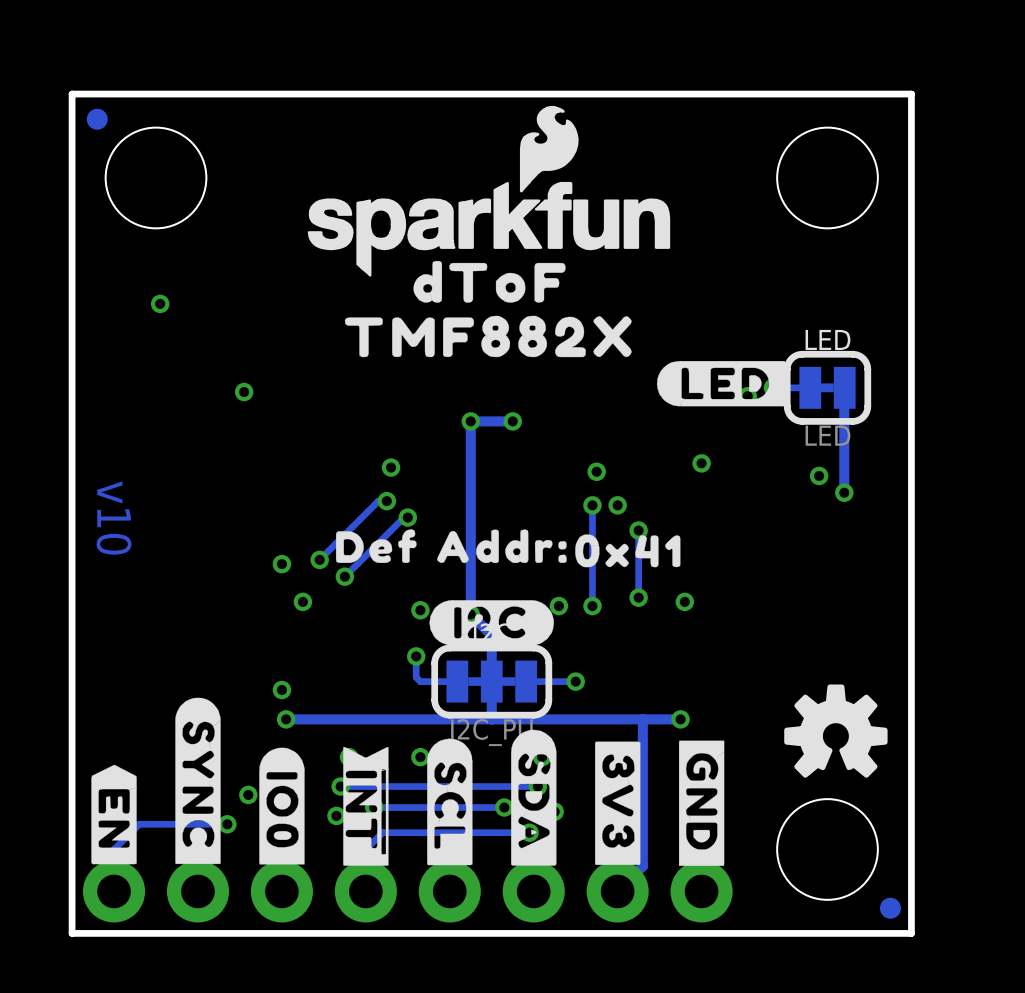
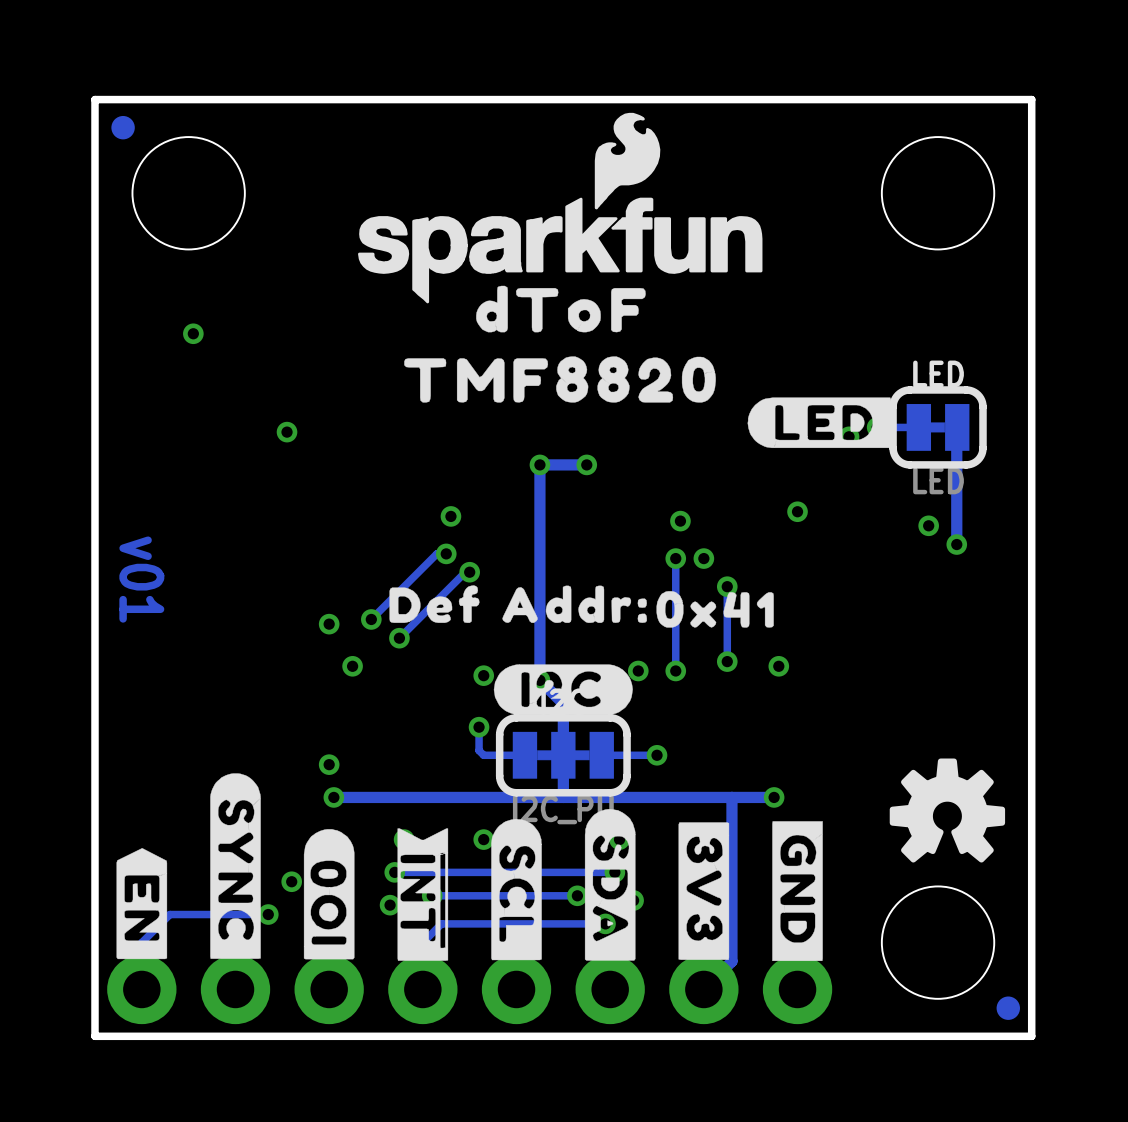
drawing shape: [344, 315, 632, 358] -> [404, 356, 716, 403]
text: v10 (114, 518) -> v01 (141, 579)
drawing shape: [259, 747, 305, 865] -> [303, 829, 355, 960]

